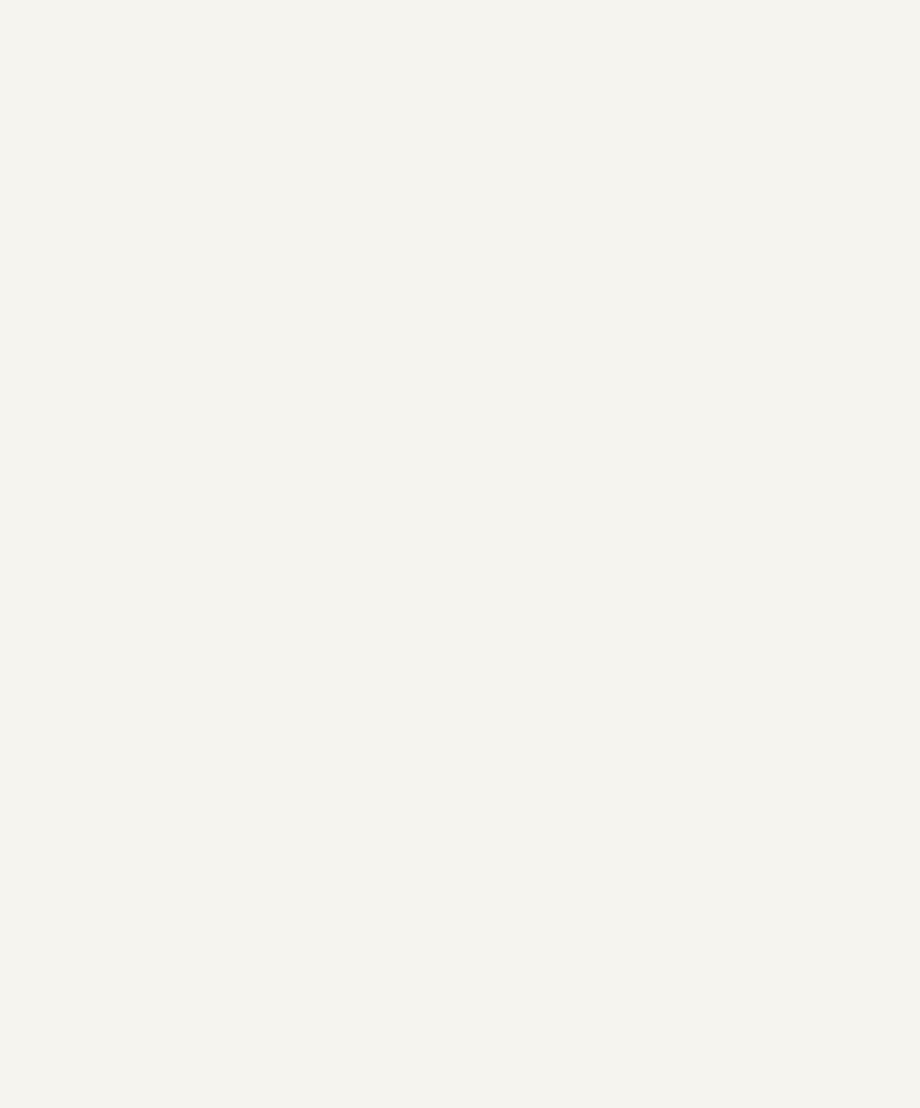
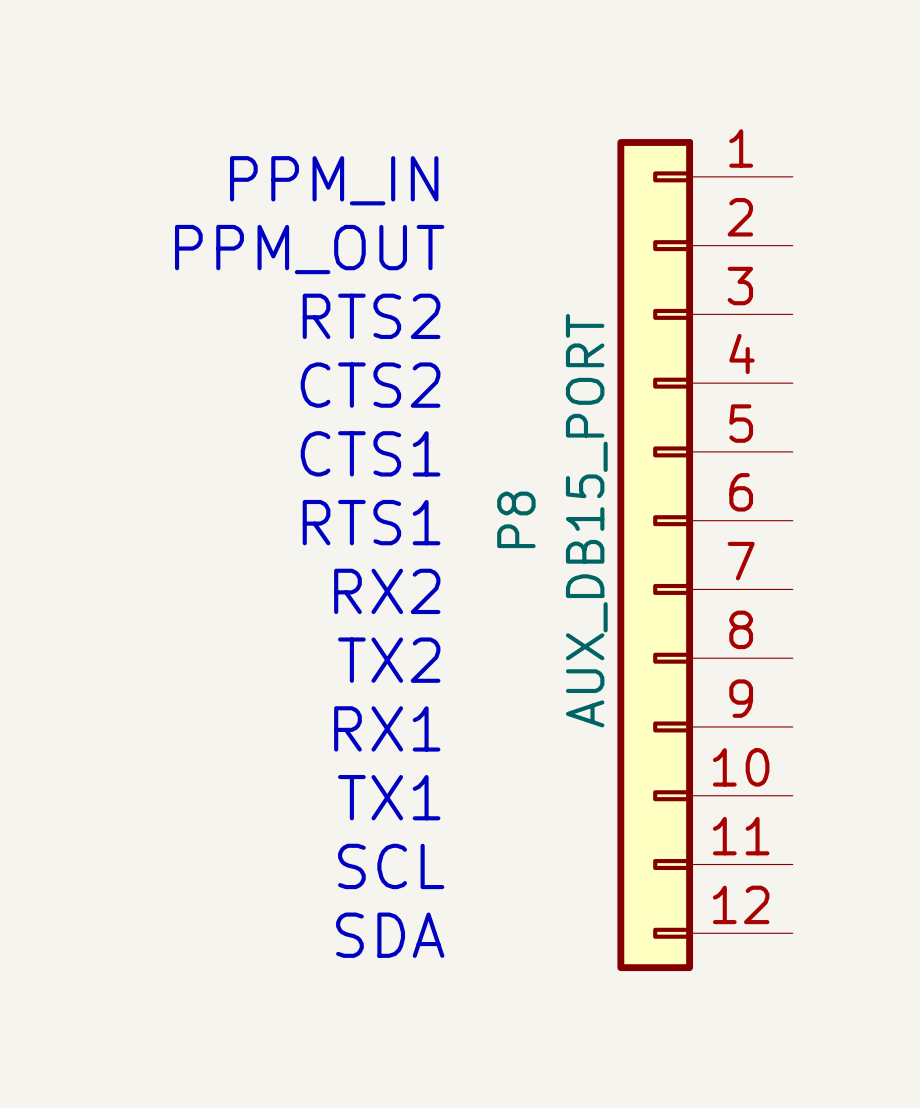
text: none -> PPM_IN (334, 180)
text: none -> PPM_OUT (309, 249)
text: none -> RTS2 (371, 316)
text: none -> CTS2 (370, 385)
text: none -> CTS1 (370, 453)
text: none -> RTS1 (371, 522)
P8: none -> AUX_DB15_PORT (705, 555)
text: none -> RX2 (387, 591)
text: none -> TX2 (389, 660)
text: none -> RX1 (387, 728)
text: none -> TX1 (389, 797)
text: none -> SCL (391, 866)
text: none -> SDA (390, 935)

